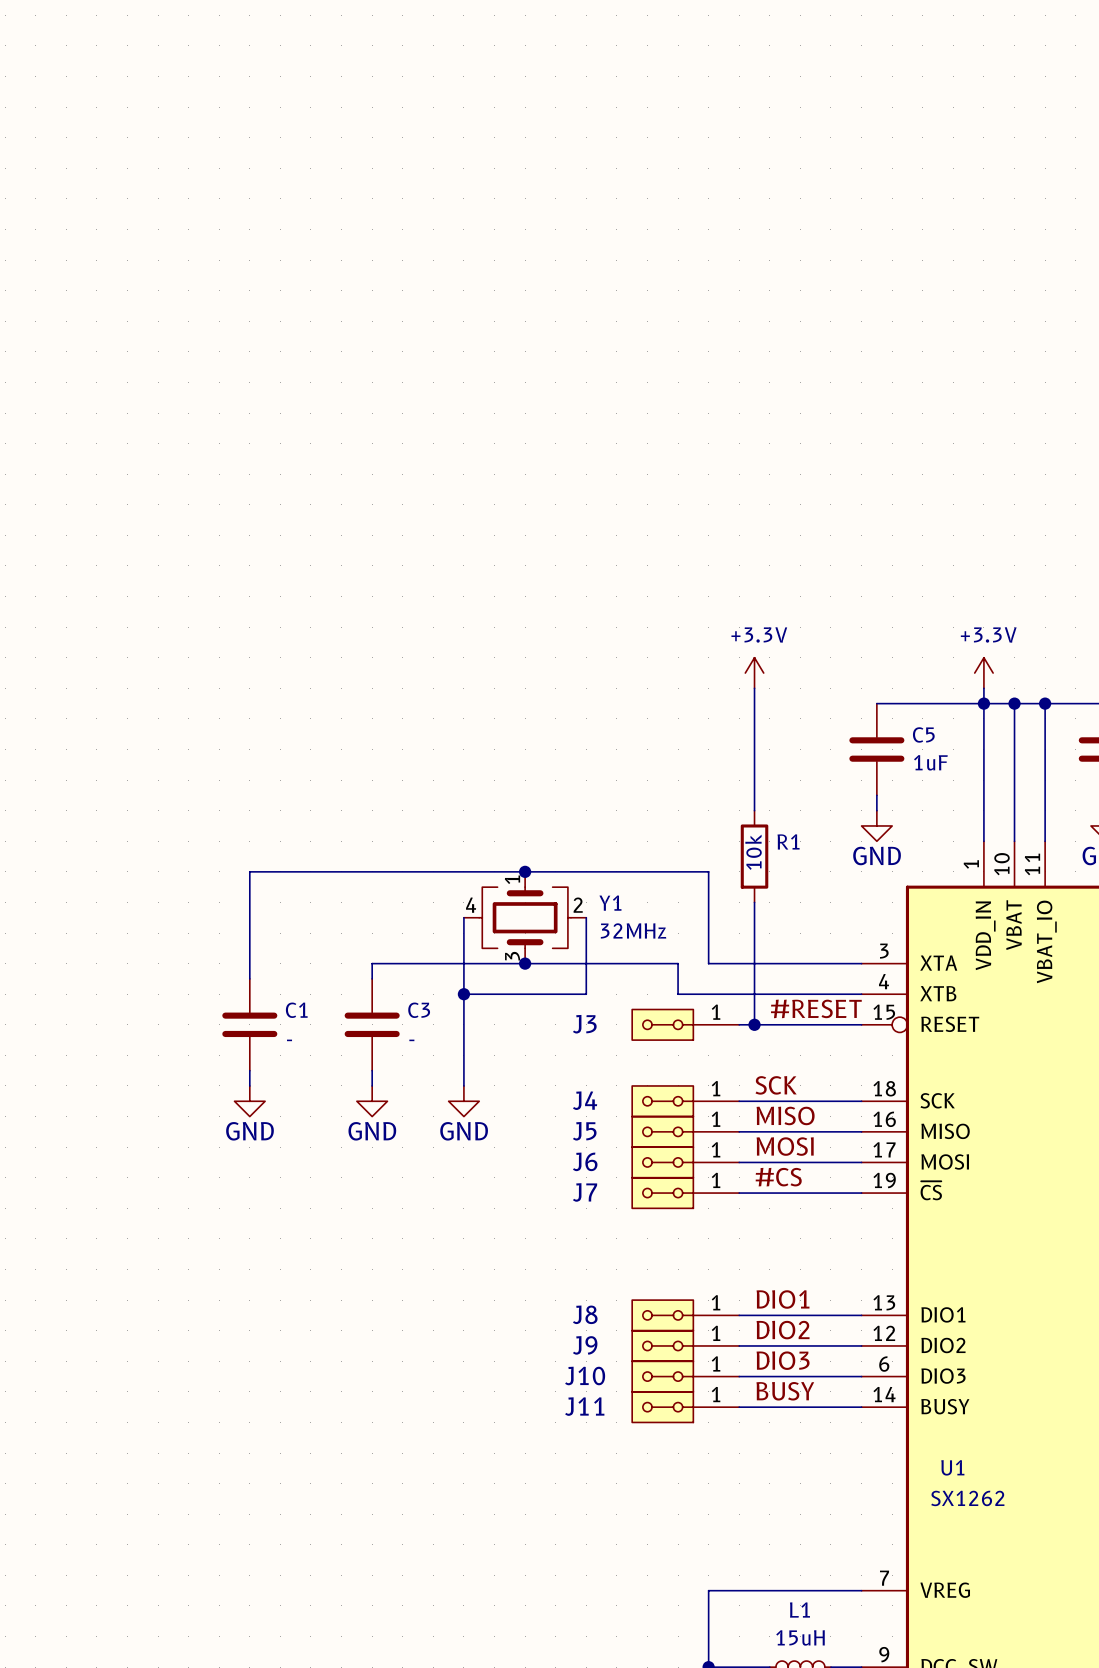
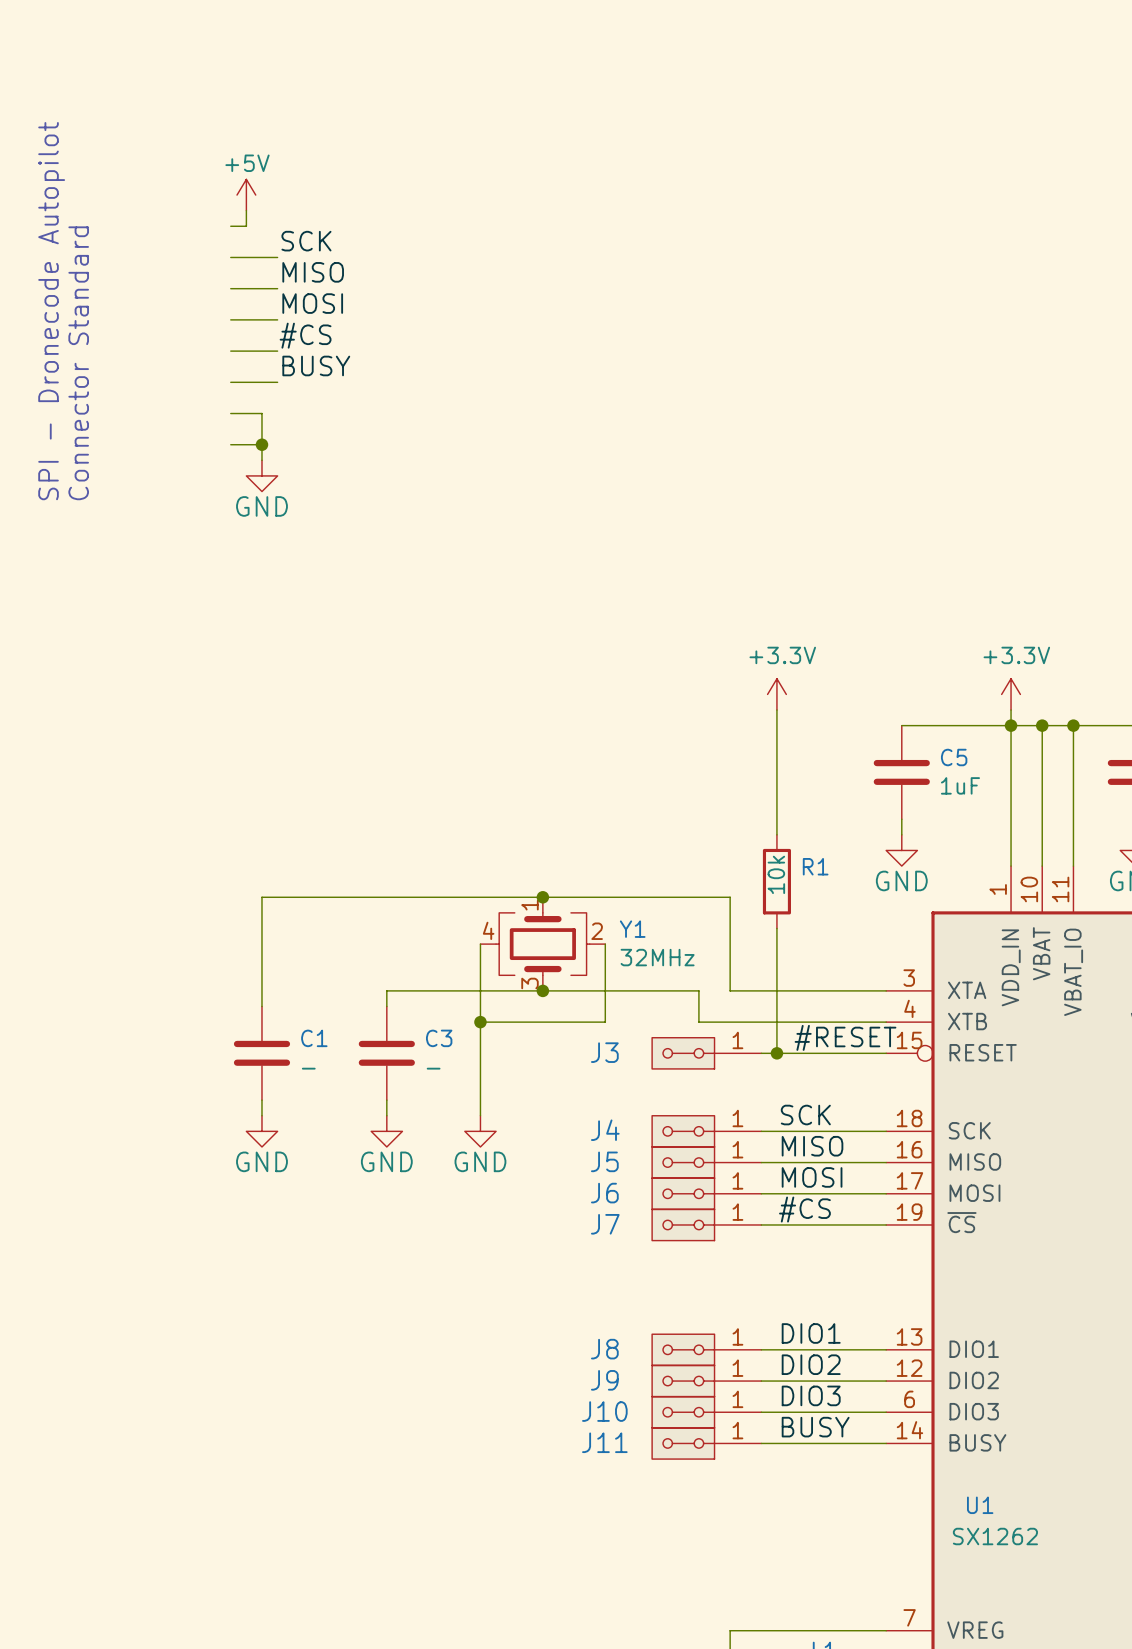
power symbol: none -> +5V (246, 195)
wire: none -> (246, 210) (246, 226) (230, 226)
label: none -> SCK (306, 241)
wire: none -> (230, 257) (277, 257)
label: none -> MISO (313, 272)
wire: none -> (230, 288) (277, 288)
label: none -> MOSI (312, 303)
wire: none -> (230, 319) (277, 319)
label: none -> #CS (305, 335)
text: none -> SPI - Dronecode Autopilot (51, 311)
wire: none -> (230, 351) (277, 351)
label: none -> BUSY (316, 365)
wire: none -> (230, 382) (277, 382)
text: none -> Connector Standard (78, 363)
wire: none -> (230, 413) (261, 413) (261, 460)
wire: none -> (230, 444) (261, 444)
junction: none -> (261, 444)
power symbol: none -> GND (261, 475)

